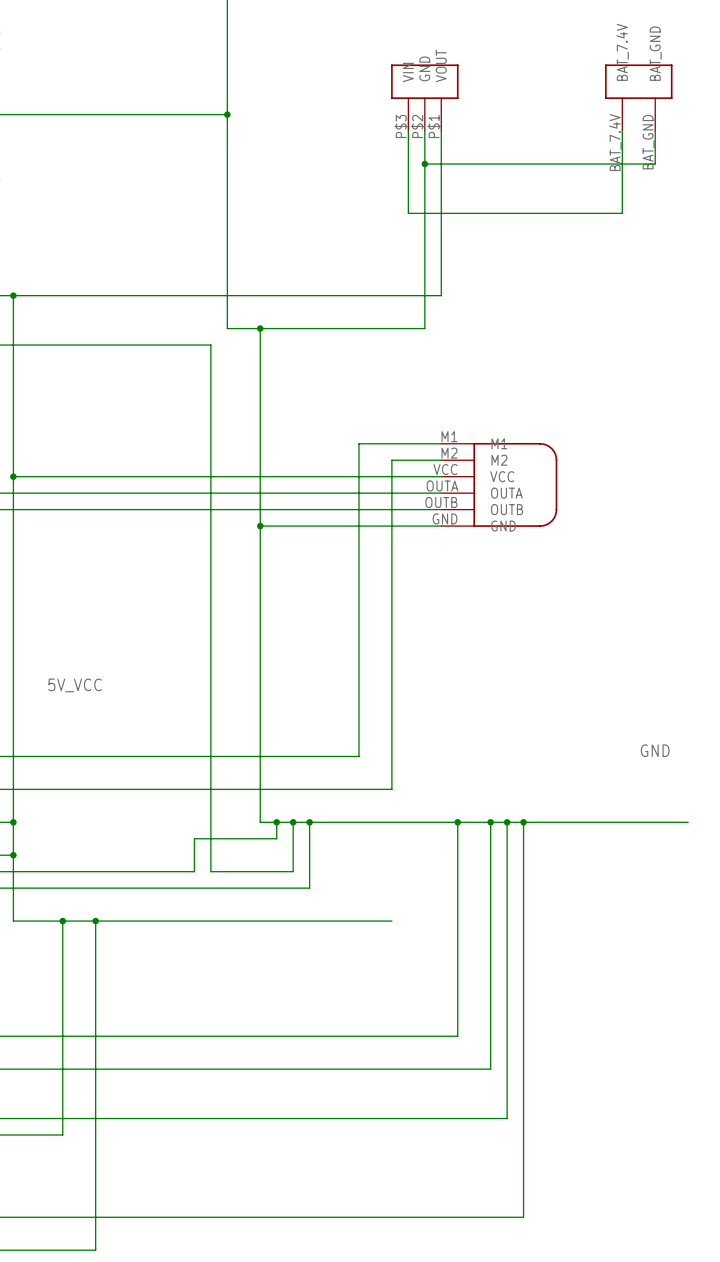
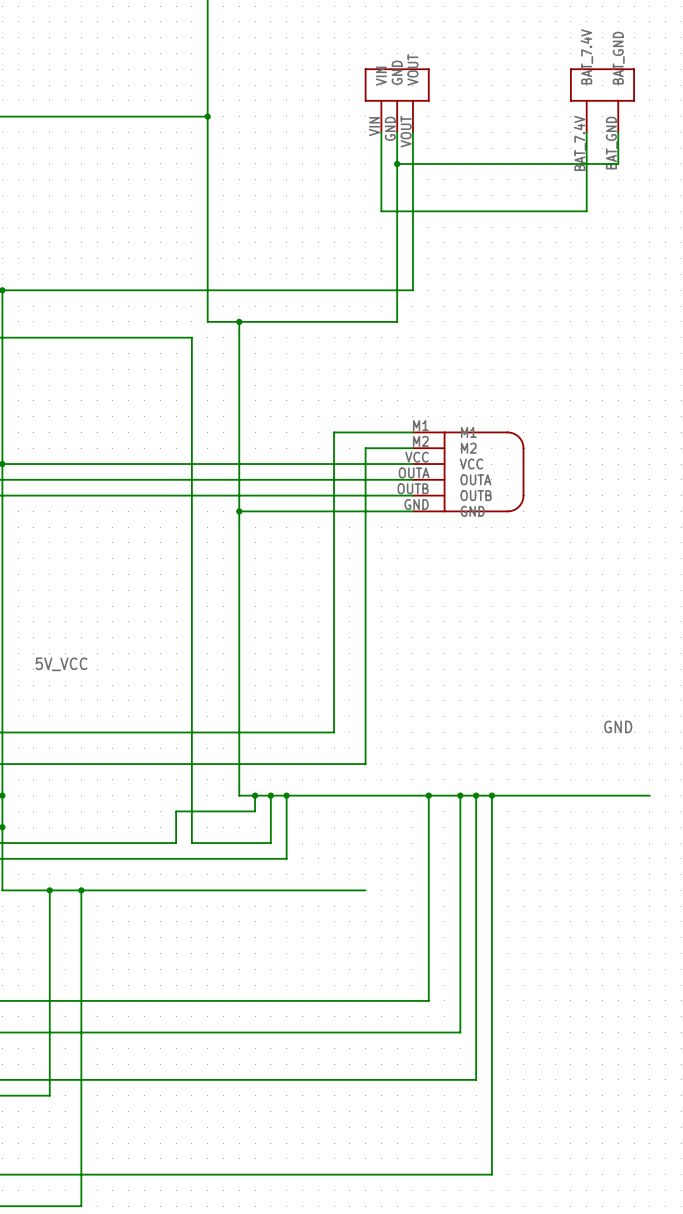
part pin number: P$3 (401, 126) -> VIN (374, 126)
part pin number: P$2 (417, 126) -> GND (390, 128)
part pin number: P$1 (434, 126) -> VOUT (406, 131)

